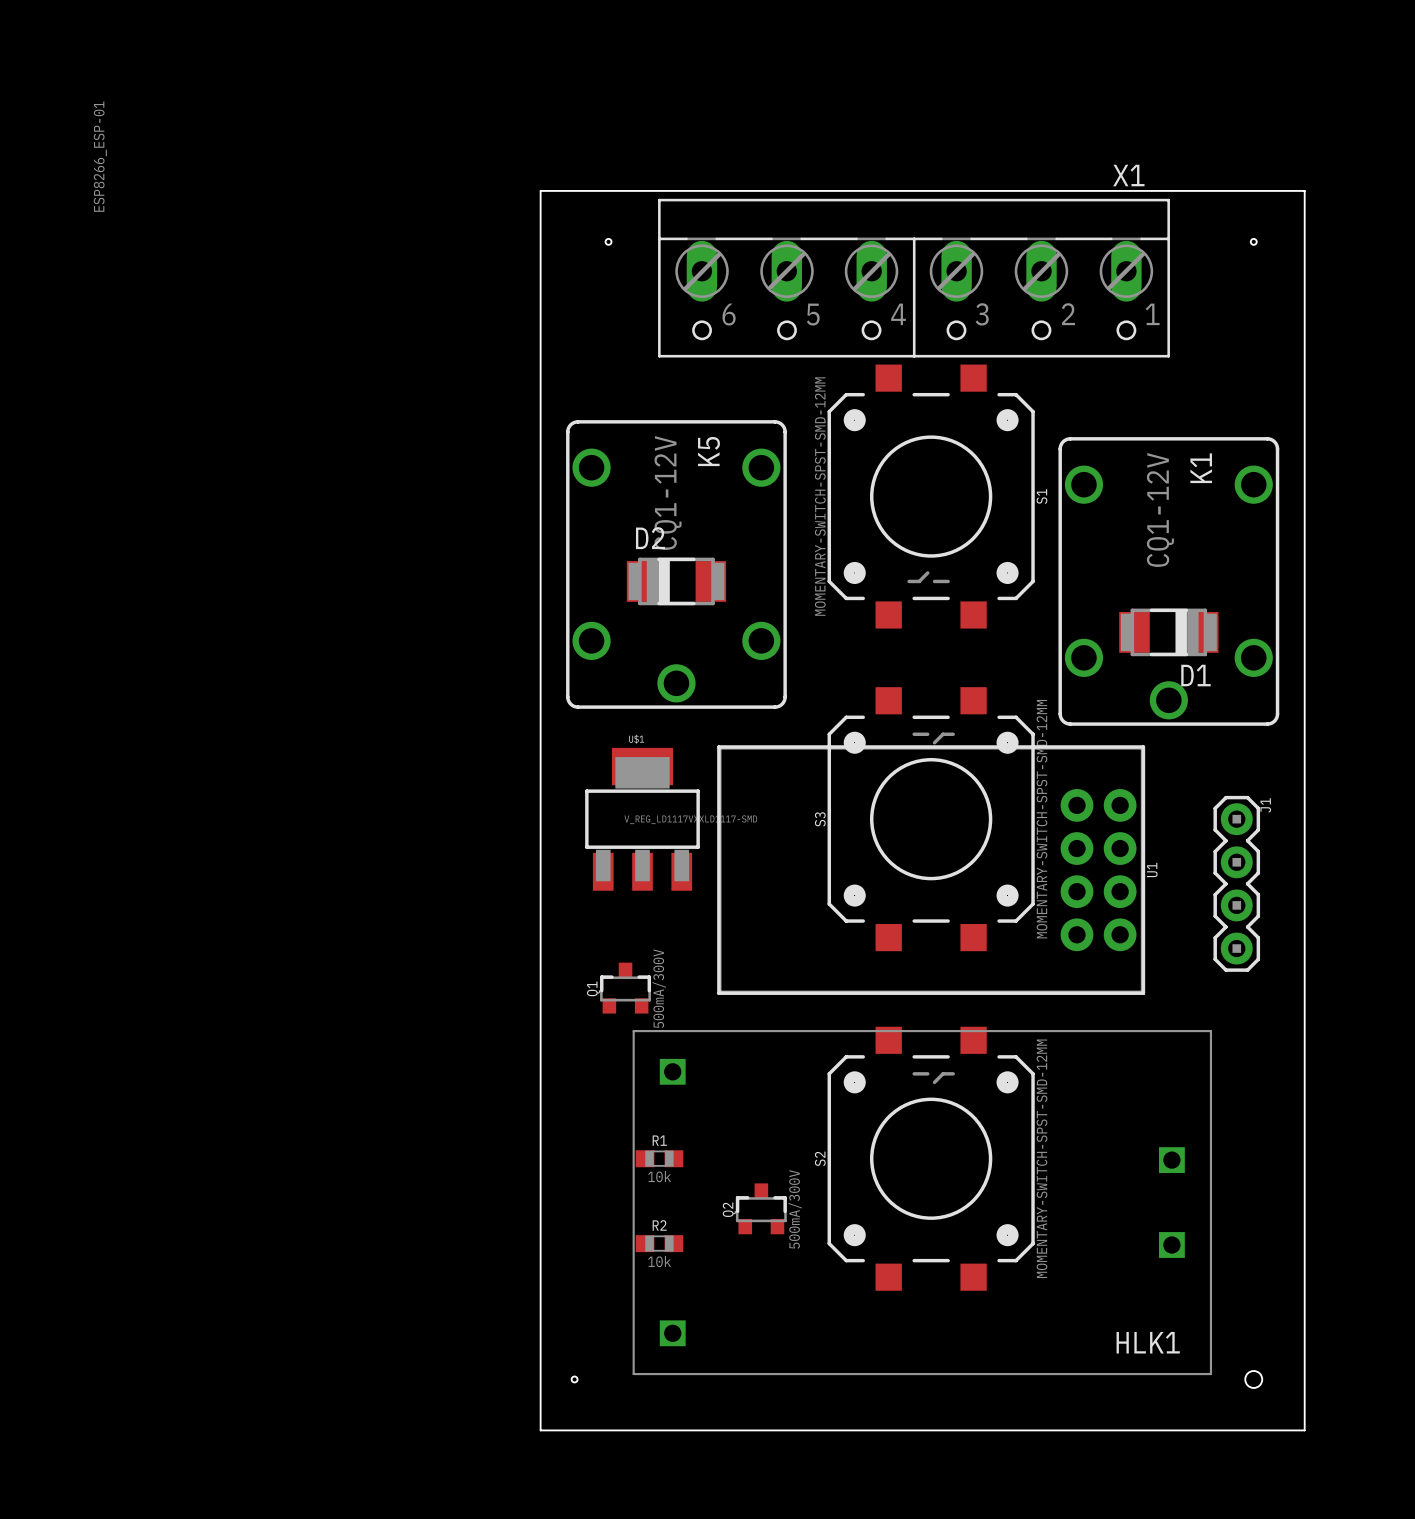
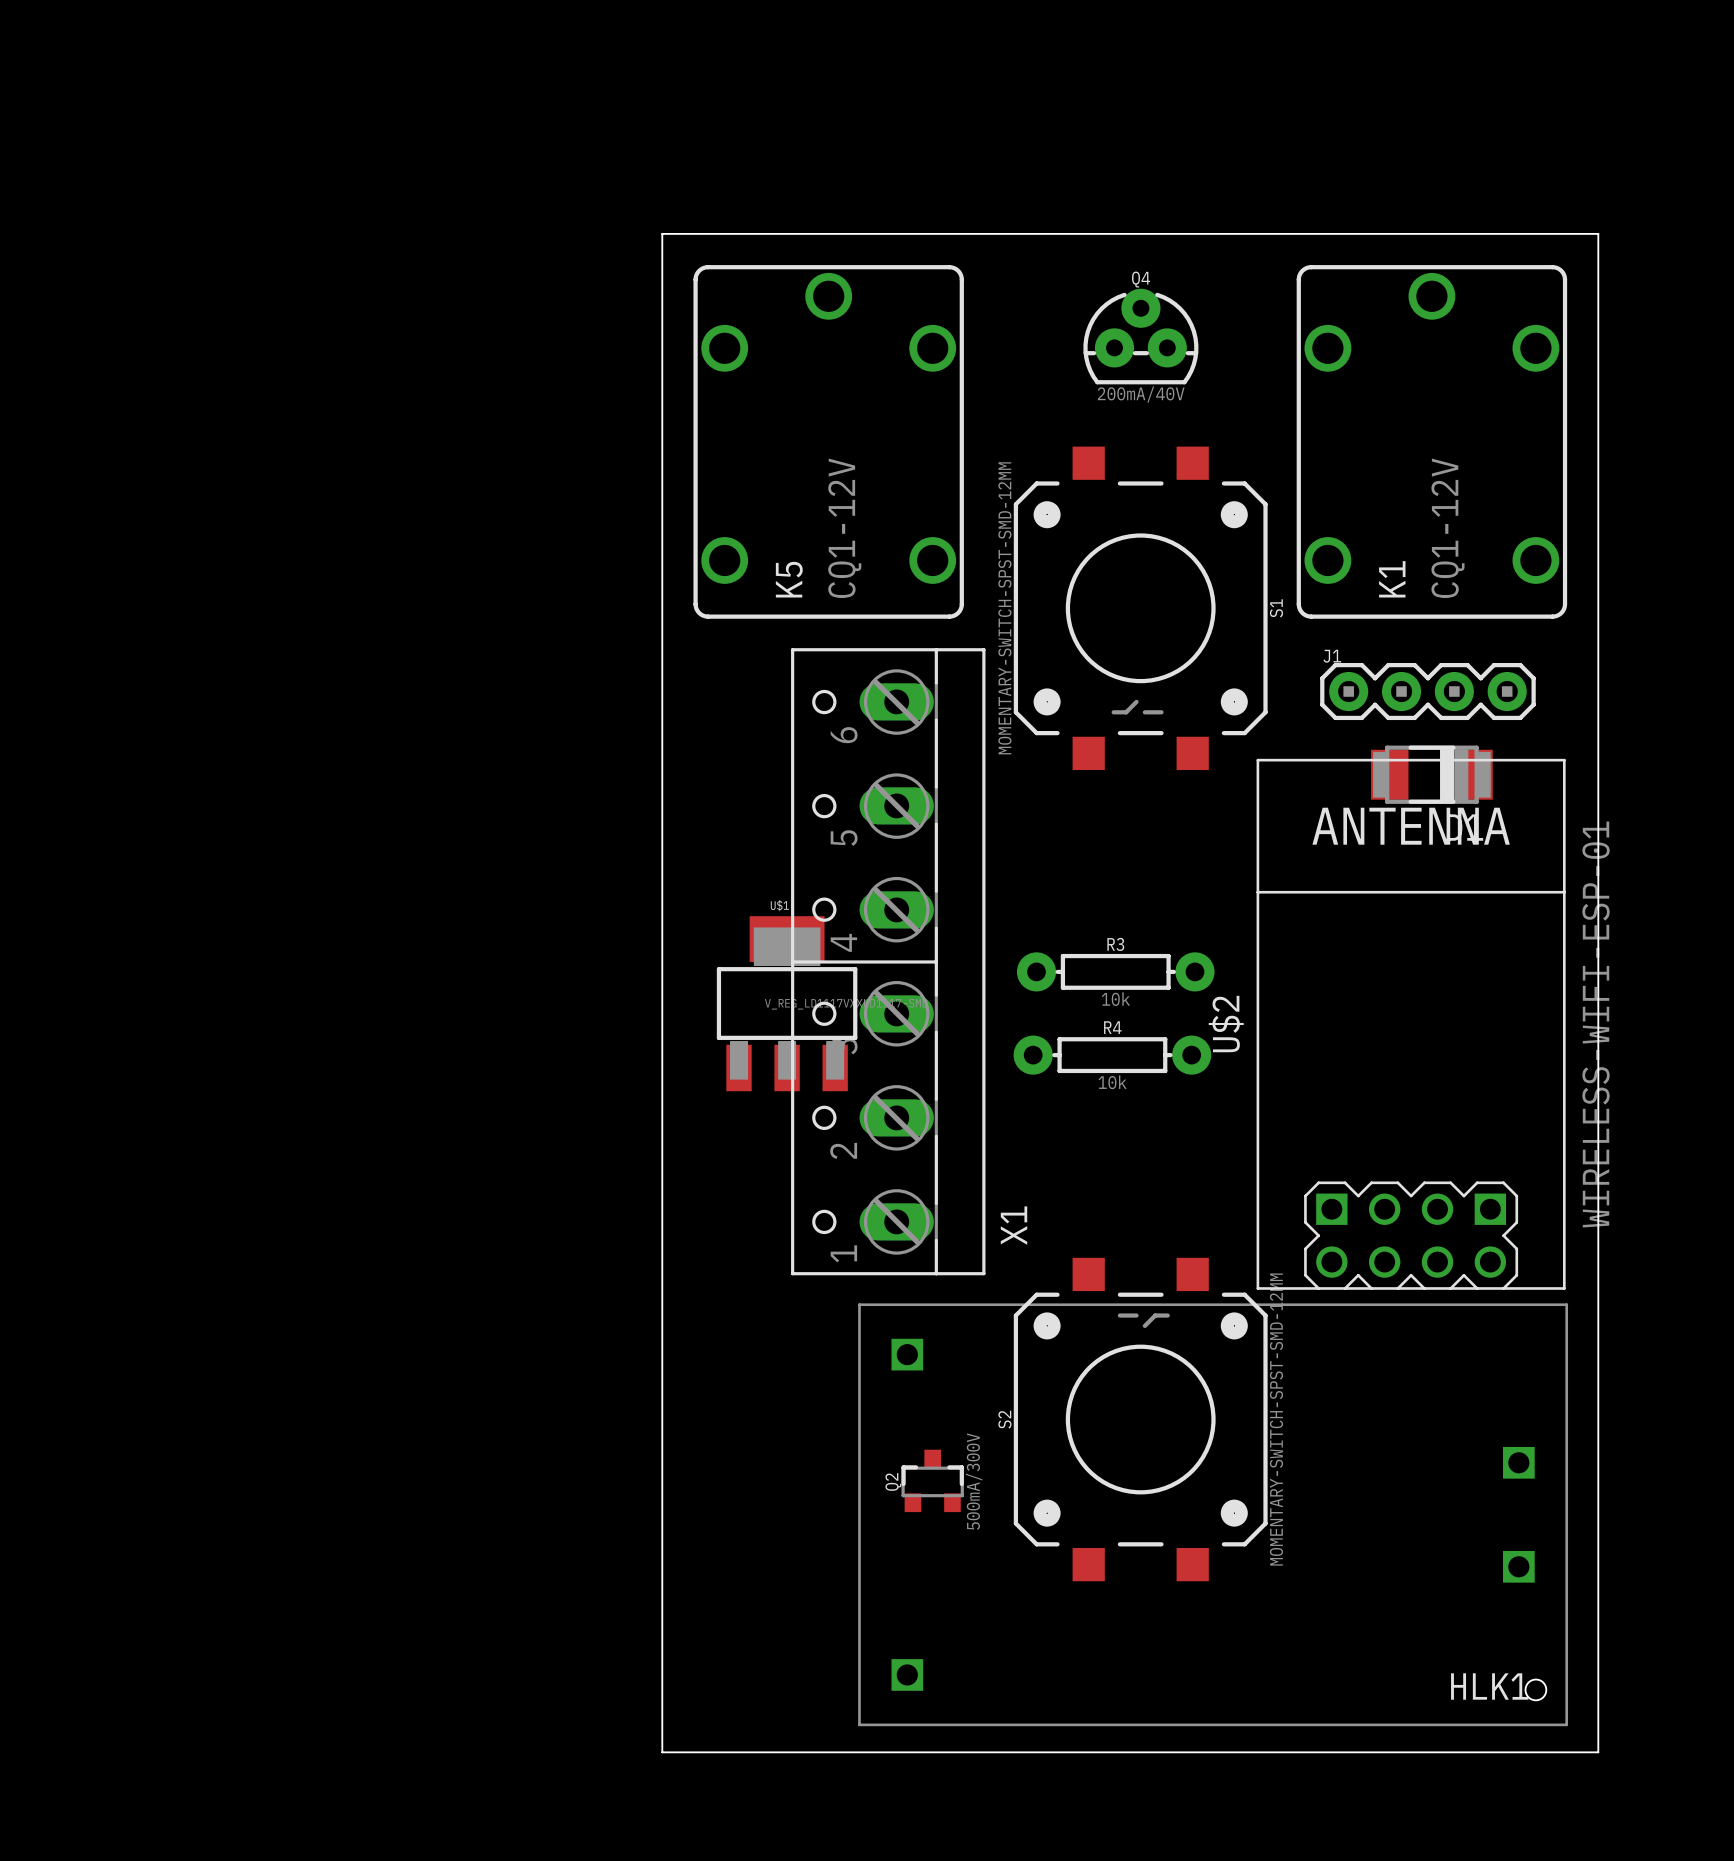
X1 name position: X1 (1128, 175) -> X1 (1014, 1225)
X1 footprint: [658, 198, 1170, 358] -> [791, 648, 986, 1276]
hole: (608, 241) -> none
hole: (1253, 241) -> none
Q4: none -> 200mA/40V (1140, 336)
K5 rotation: 0° (676, 564) -> 180° (828, 441)
K5 position: (676, 564) -> (828, 441)
D2: (676, 581) -> none
K1 rotation: 0° (1168, 581) -> 180° (1431, 441)
K1 position: (1168, 581) -> (1431, 441)
R3: none -> 10k (1115, 971)
J1 name position: J1 (1265, 805) -> J1 (1332, 656)
S3: MOMENTARY-SWITCH-SPST-SMD-12MM (931, 819) -> none
U$2: none -> WIRELESS-WIFI-ESP-01 (1411, 1024)
R4: none -> 10k (1112, 1055)
U1: ESP8266_ESP-01 (931, 870) -> none
J1 rotation: 0° (1236, 883) -> 90° clockwise (1427, 691)
J1 position: (1236, 883) -> (1427, 691)
Q1: 500mA/300V (625, 988) -> none
R1: 10k (659, 1158) -> none
HLK1 position: (922, 1202) -> (1213, 1514)
R2: 10k (659, 1243) -> none
hole: (574, 1379) -> none

